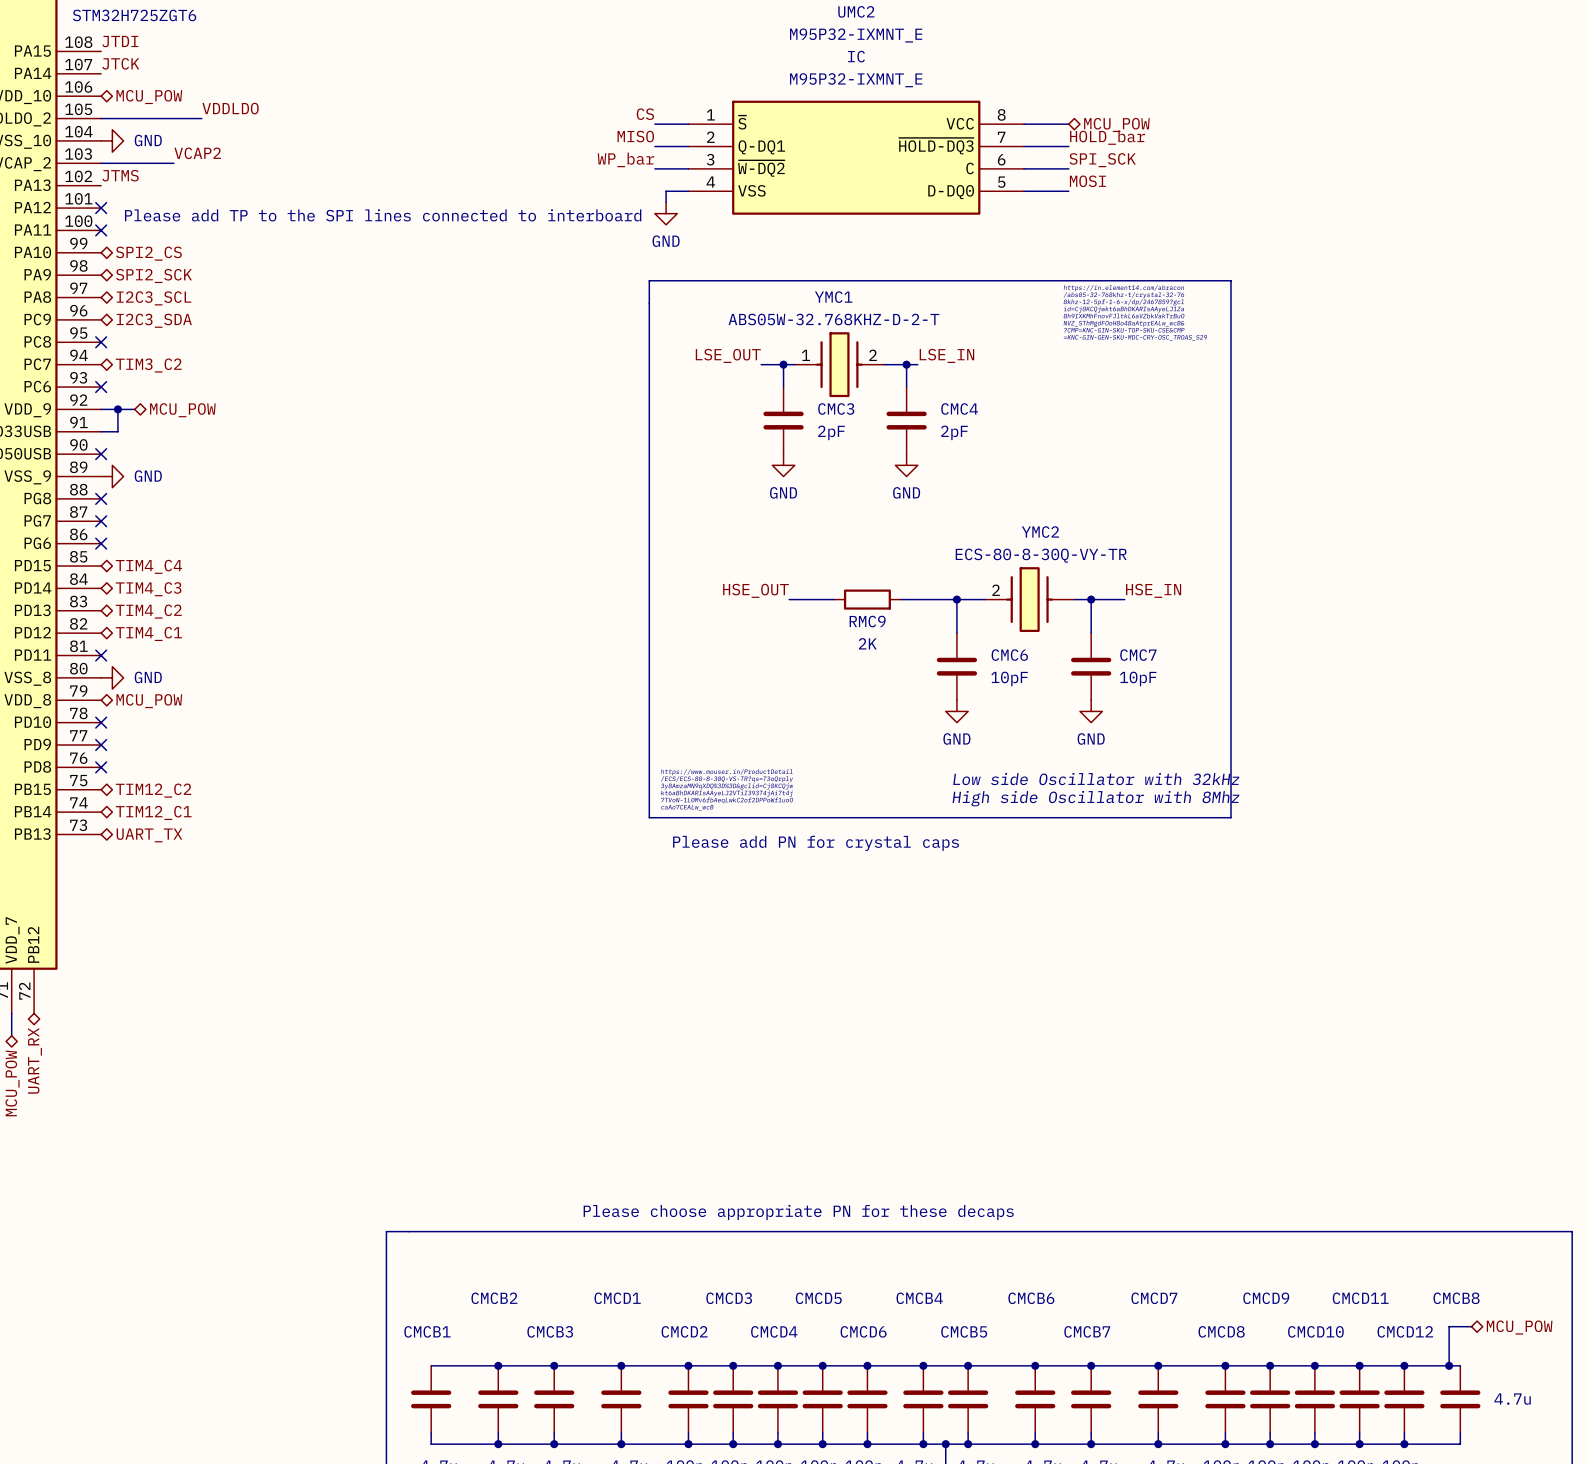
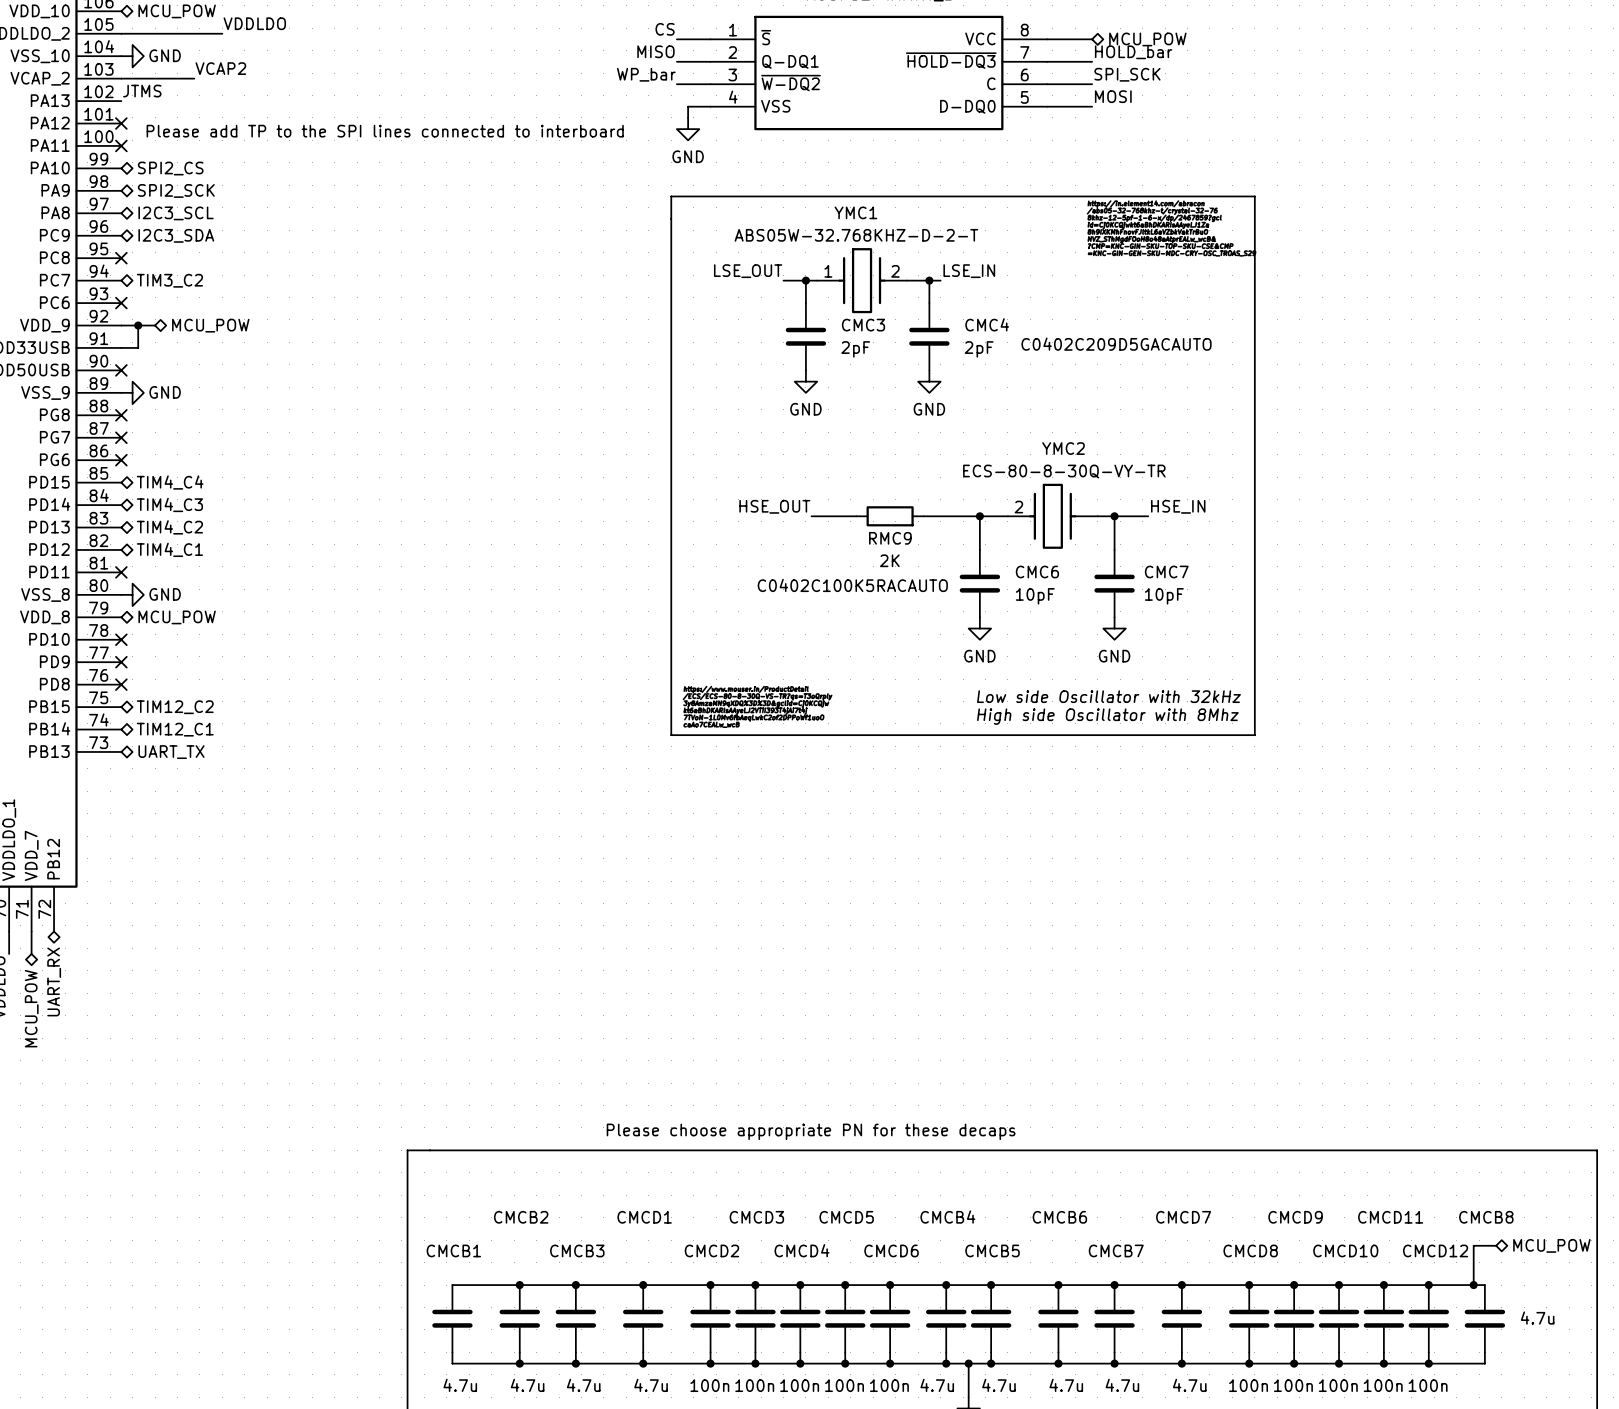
text: none -> C0402C209D5GACAUTO (1116, 344)
text: none -> C0402C100K5RACAUTO (852, 585)
text: Please add PN for crystal caps (816, 843) -> none

